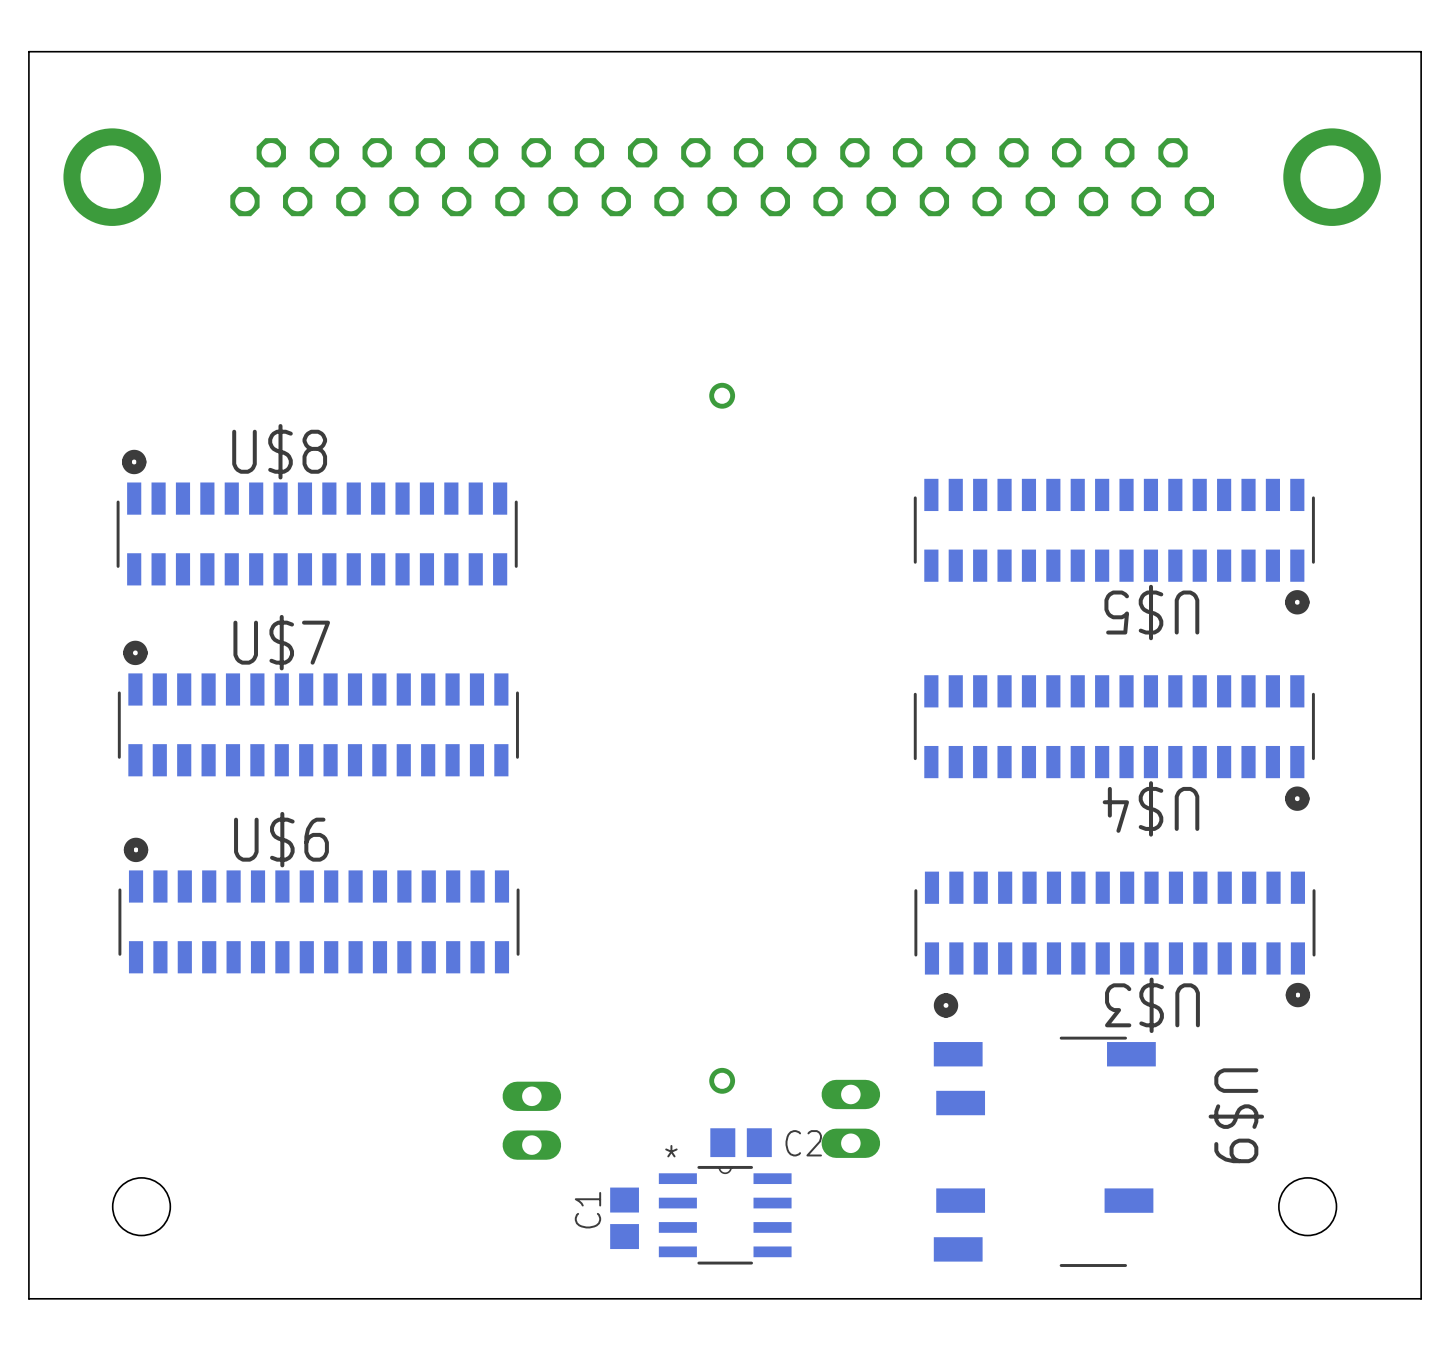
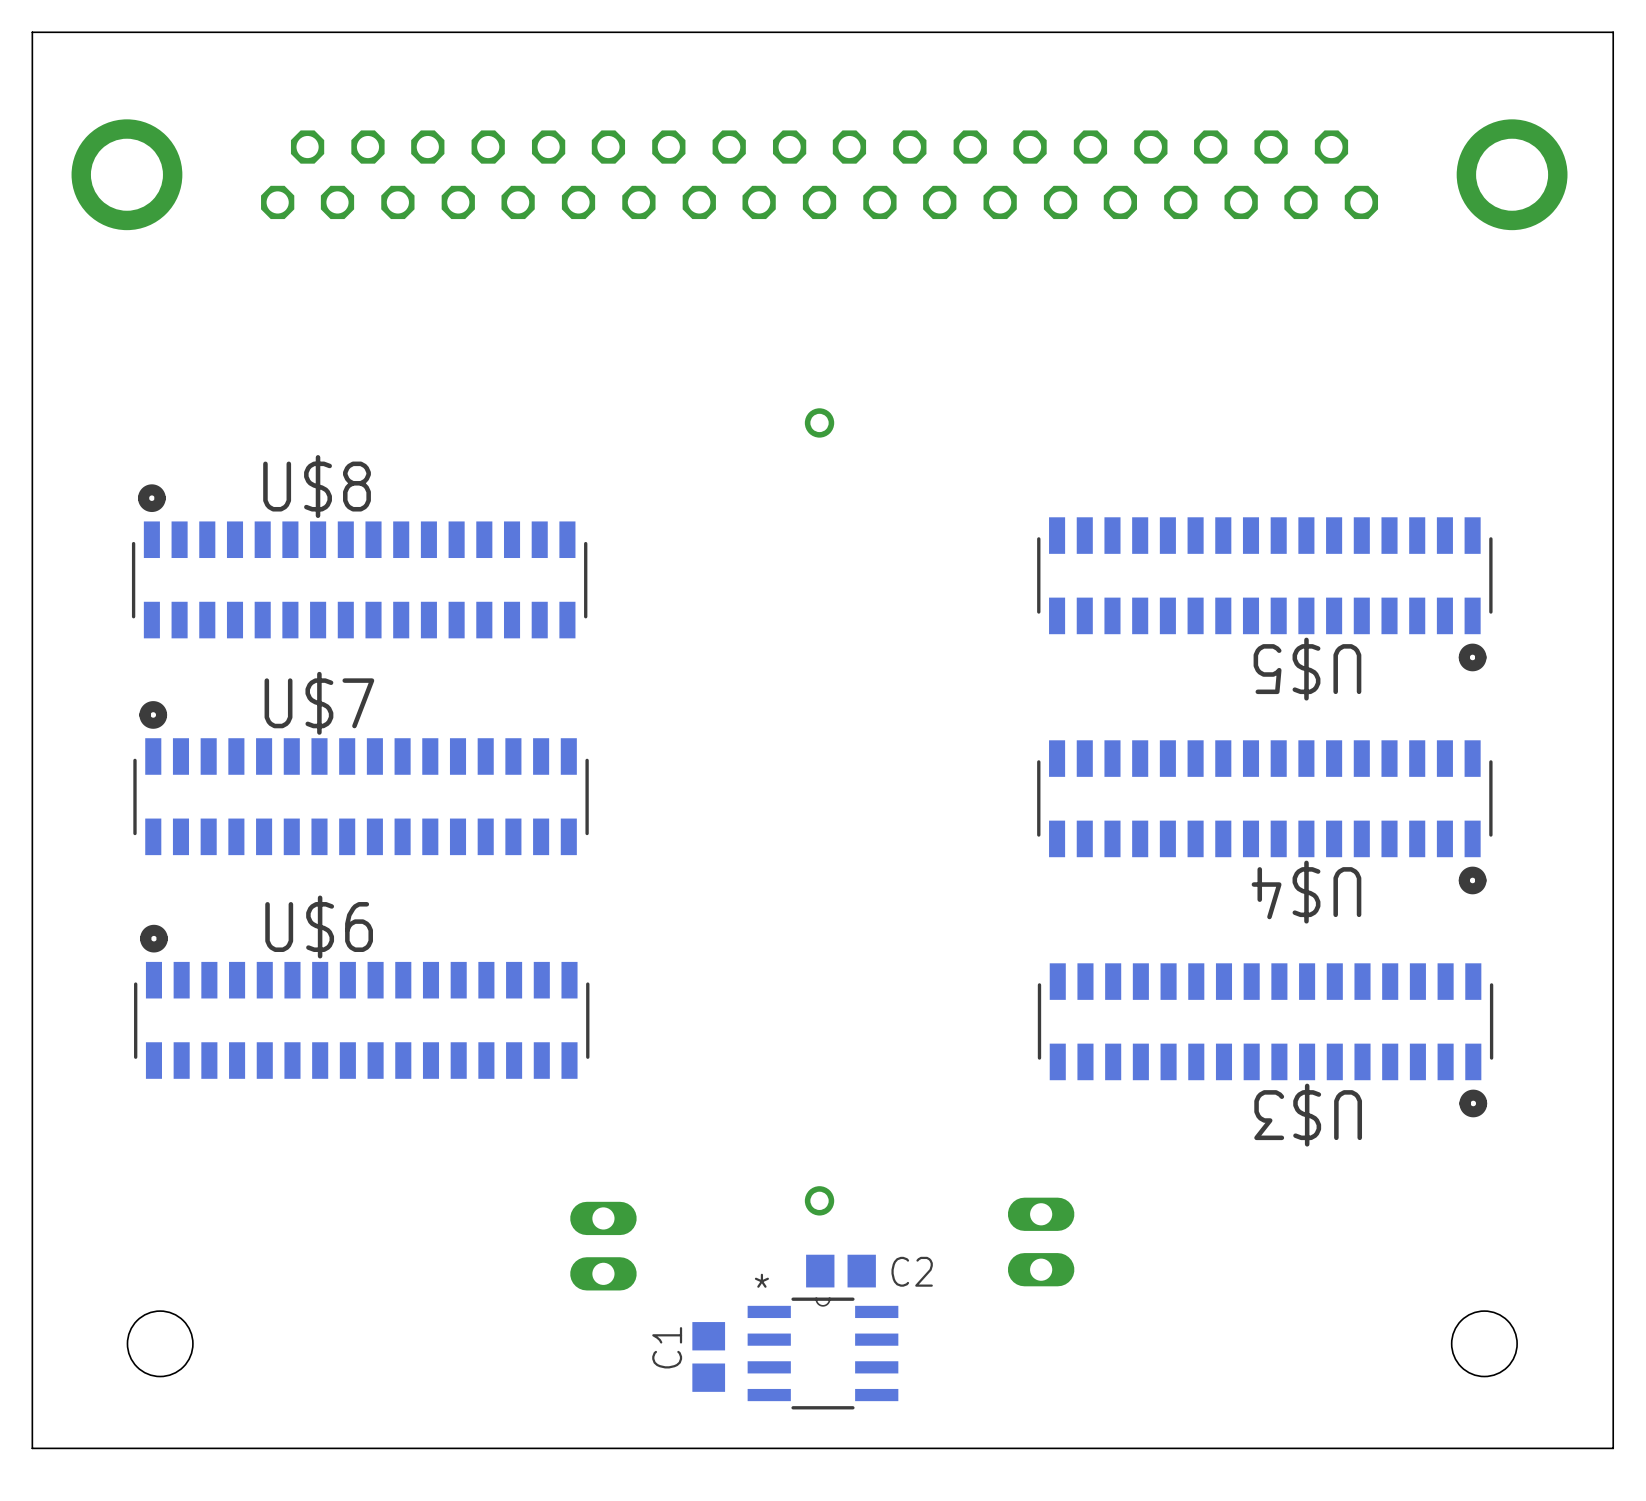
part position: (850, 1118) -> (1041, 1241)
U$9: (1044, 1130) -> none

